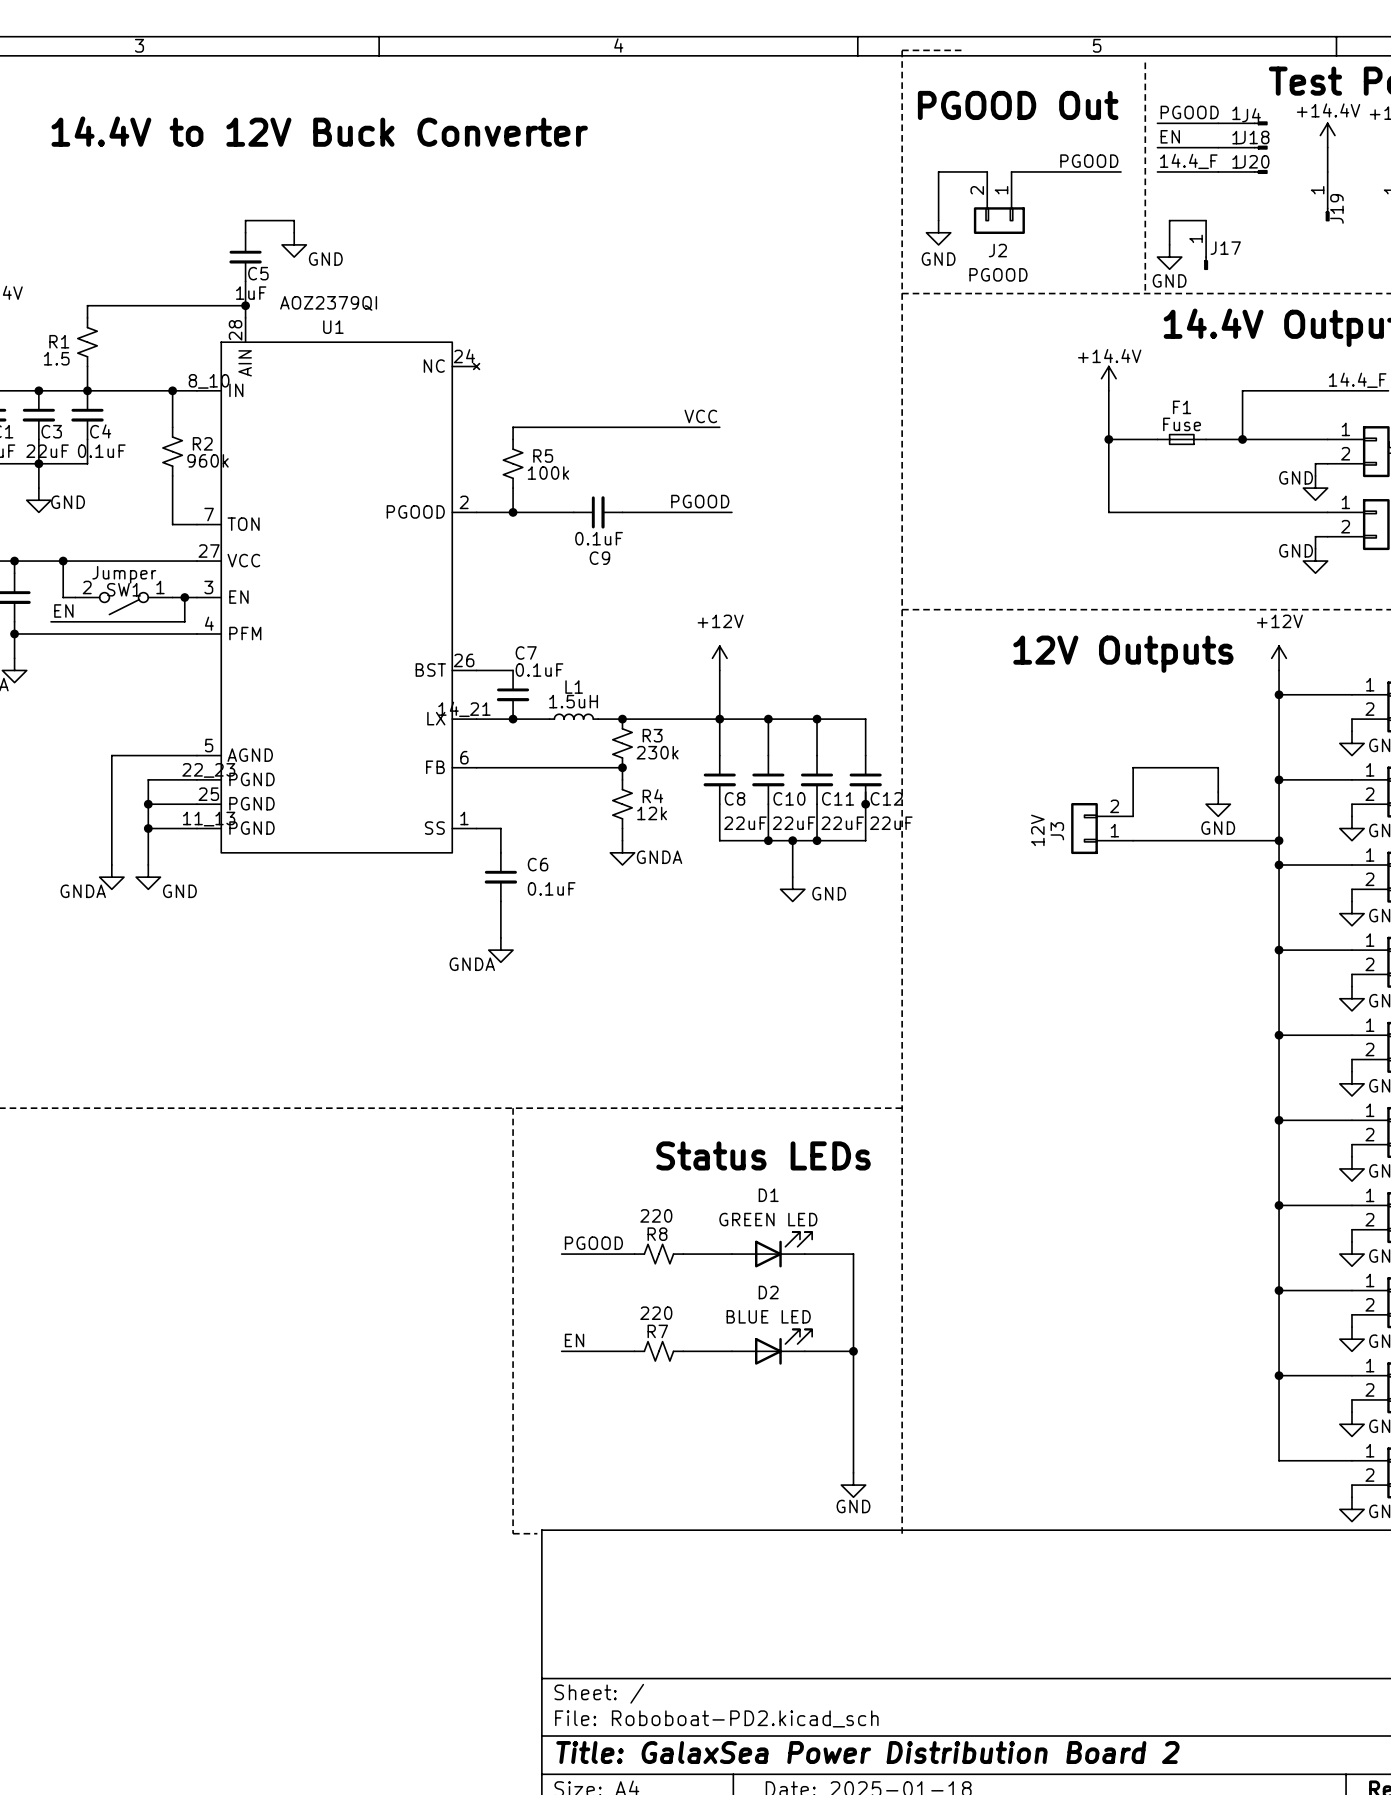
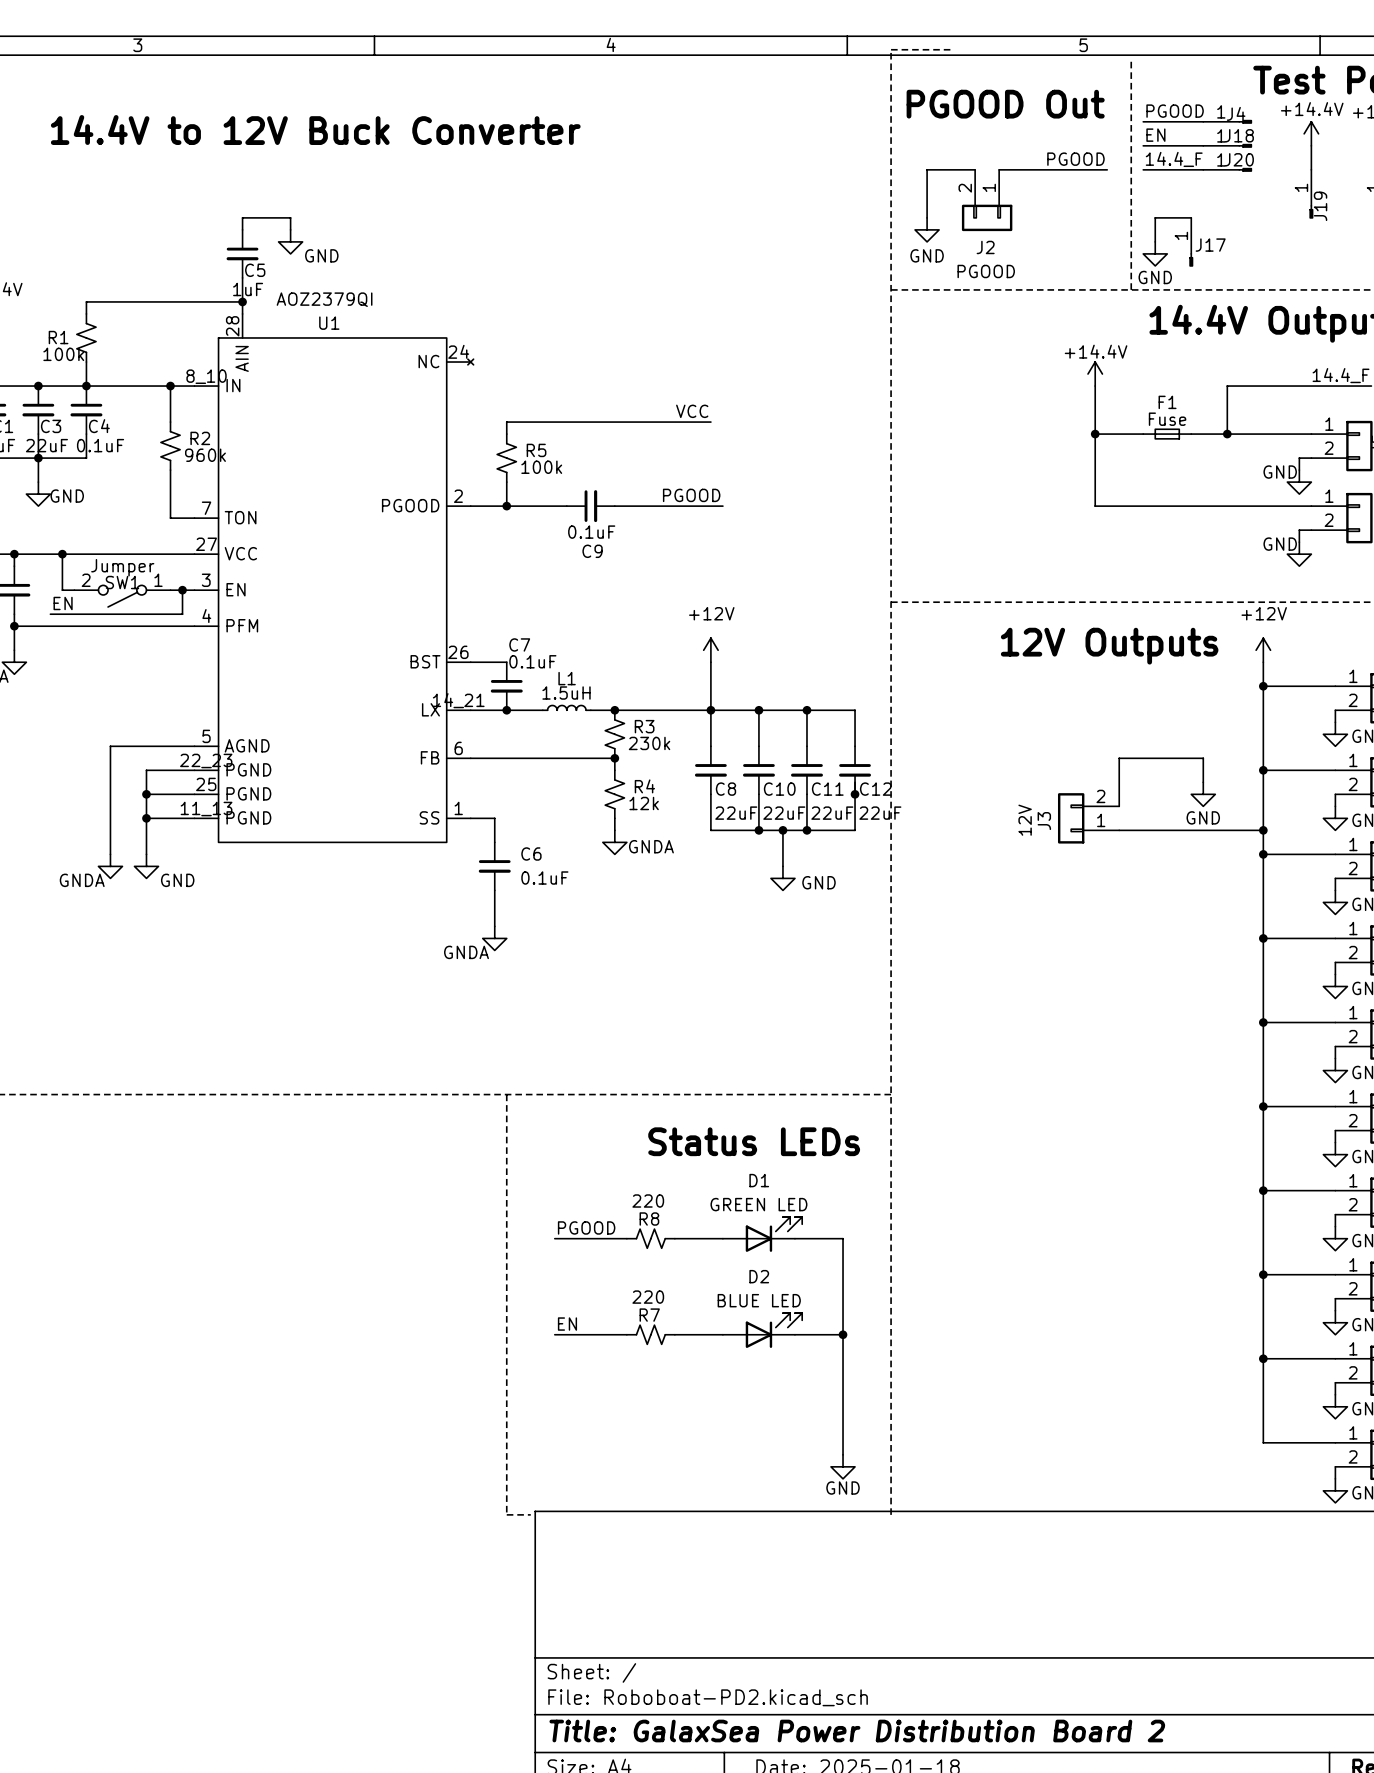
R1 value: 1.5 (56, 358) -> 100k (63, 354)

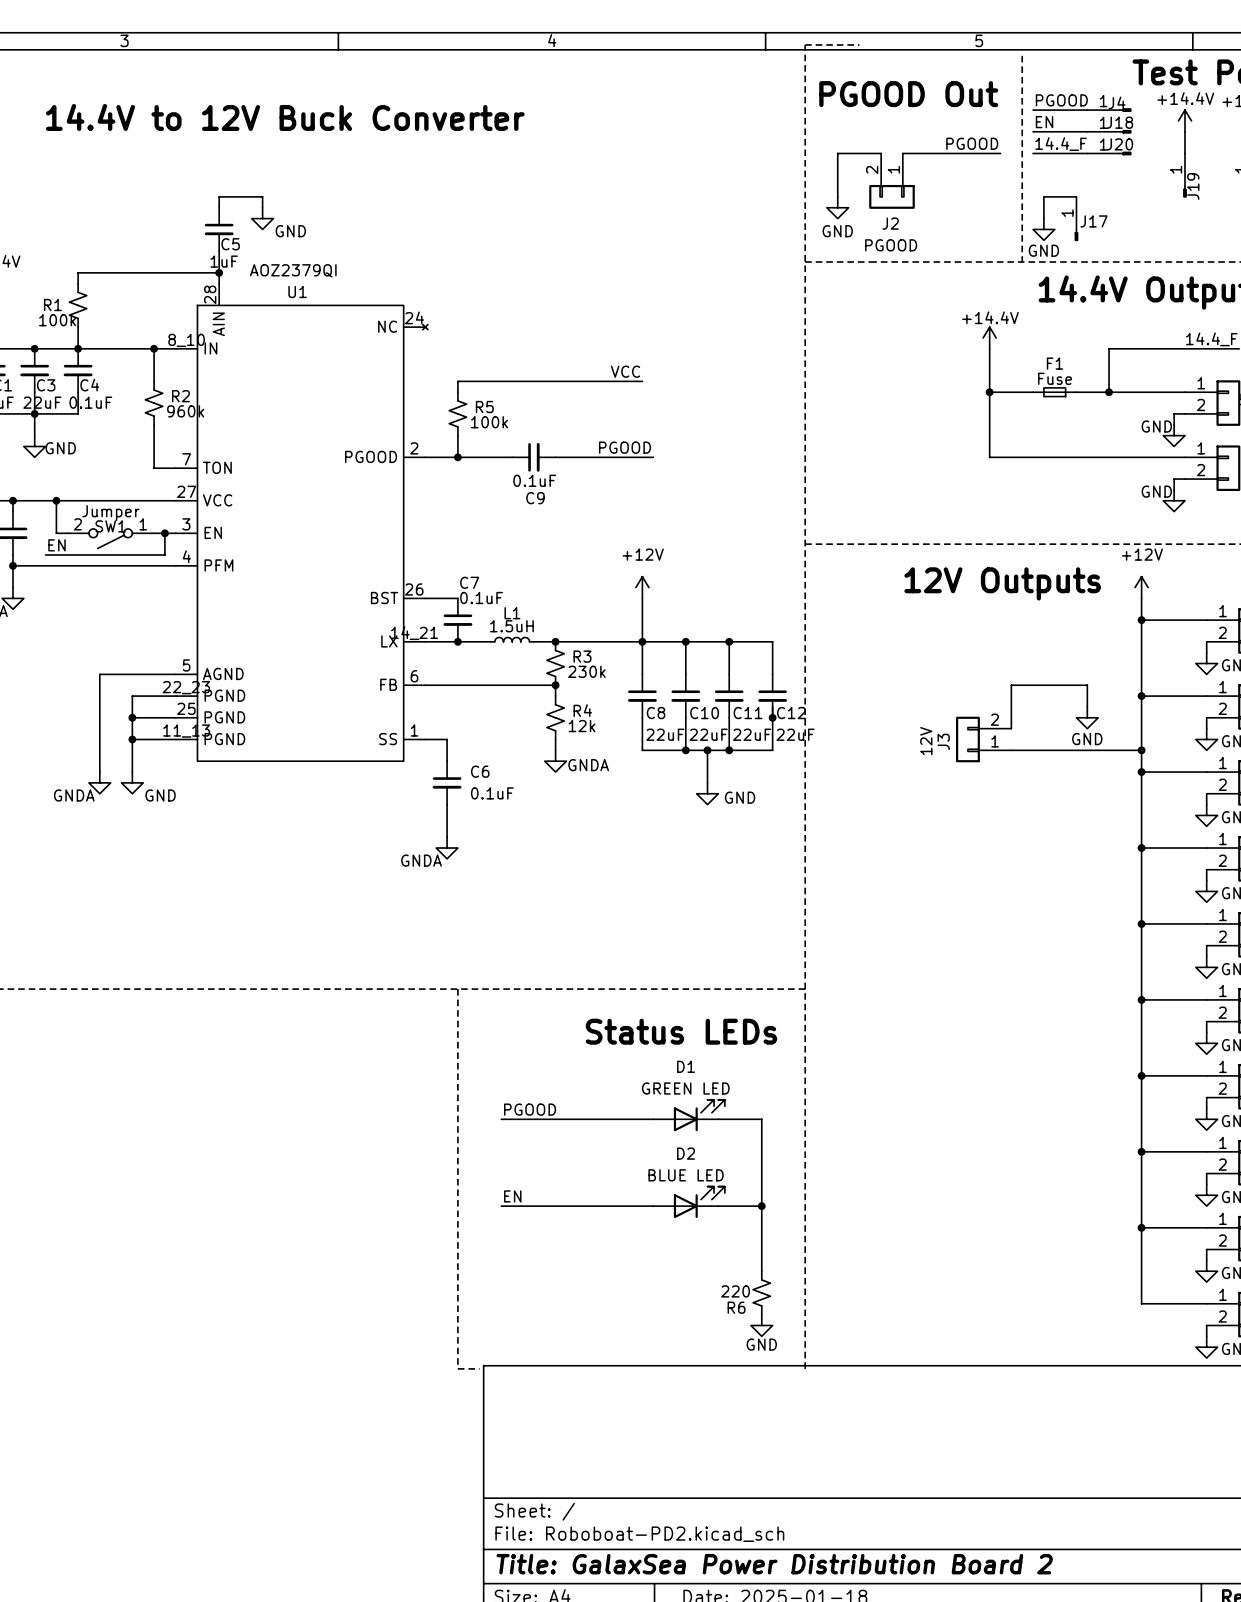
R8: 220 (650, 1238) -> none
R7: 220 (650, 1334) -> none
R6: none -> 220 (761, 1292)

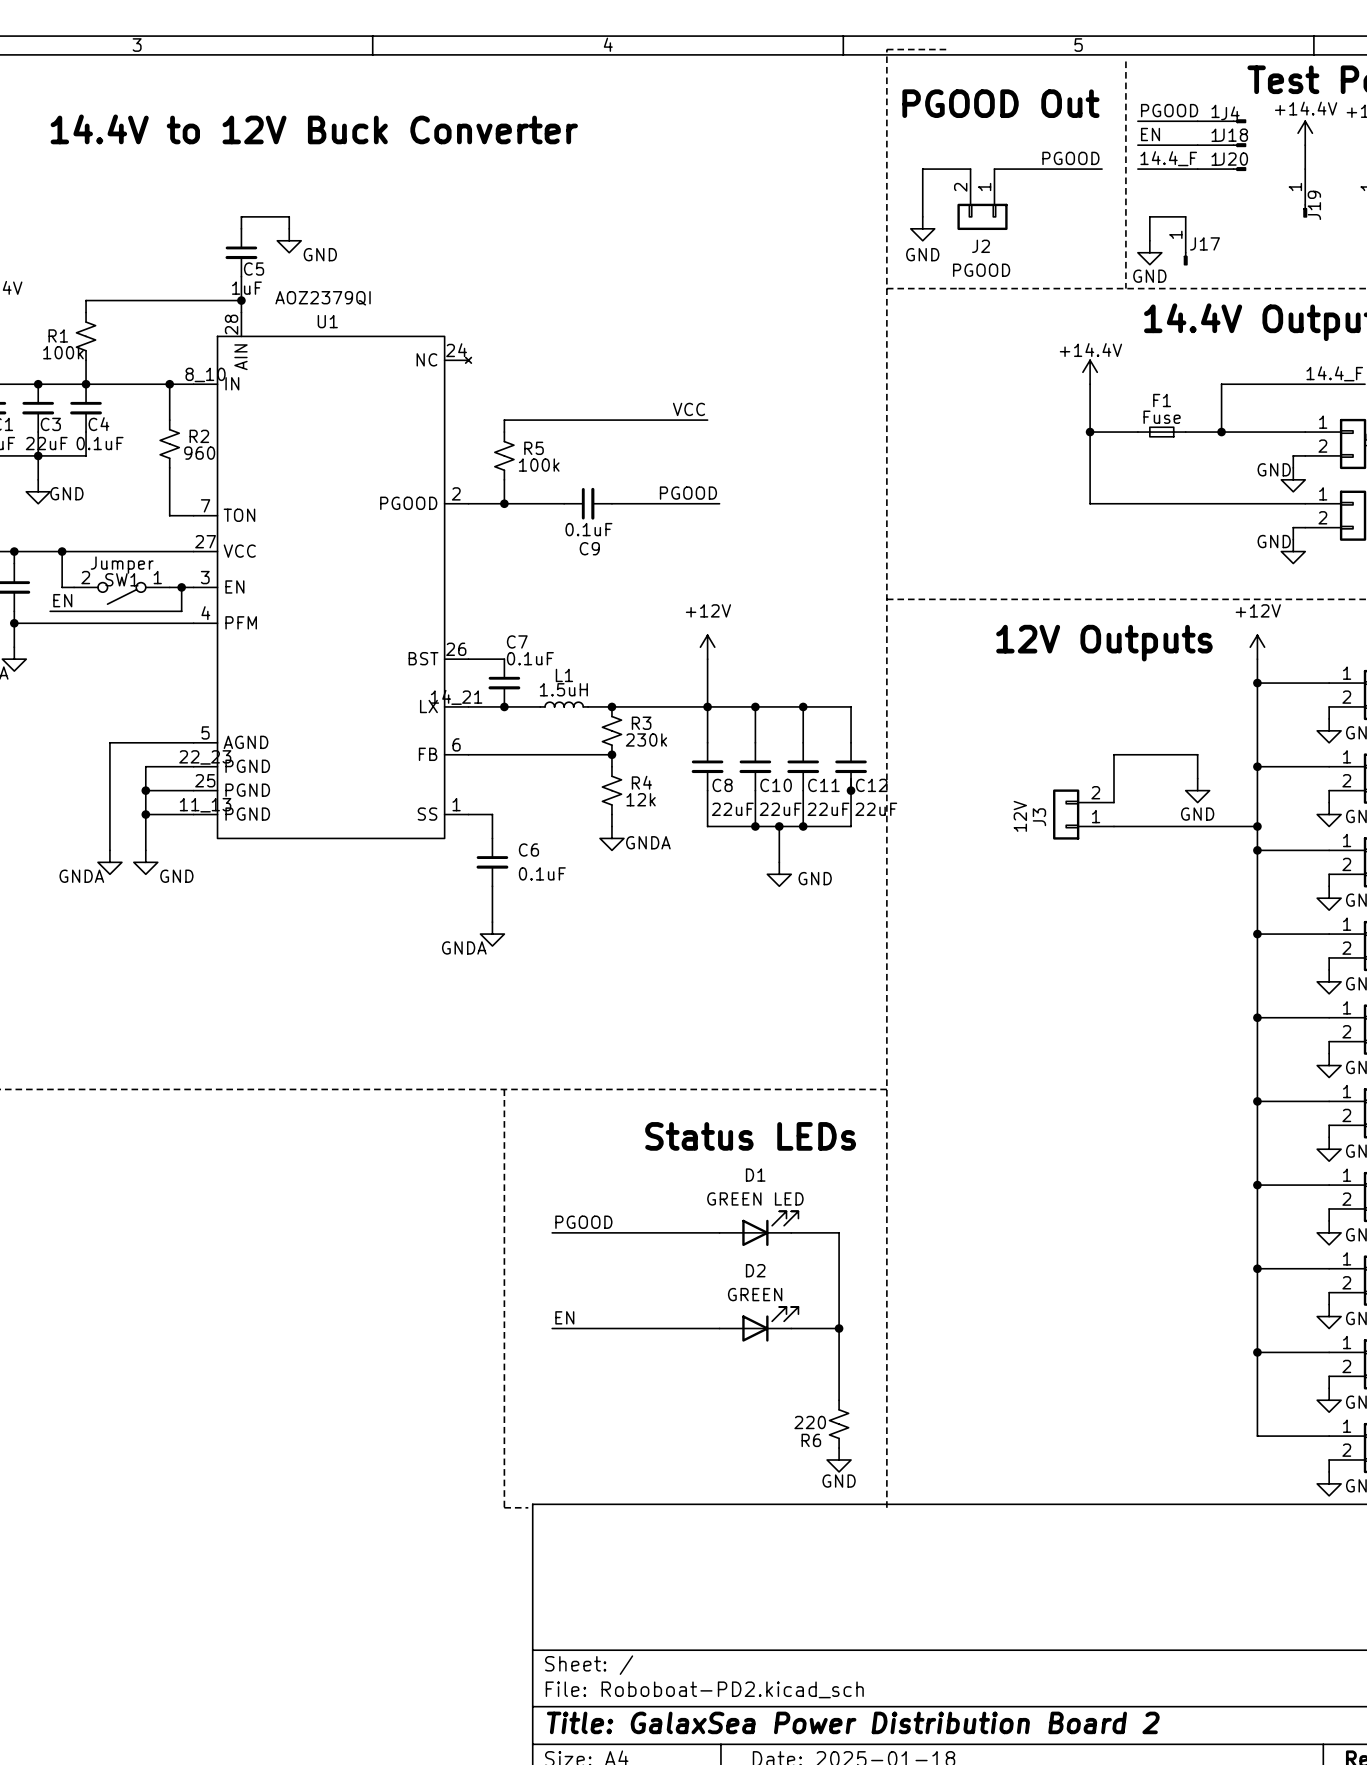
R2 value: 960k (185, 411) -> 960 (199, 453)
D2 value: BLUE LED (686, 1175) -> GREEN (755, 1294)

